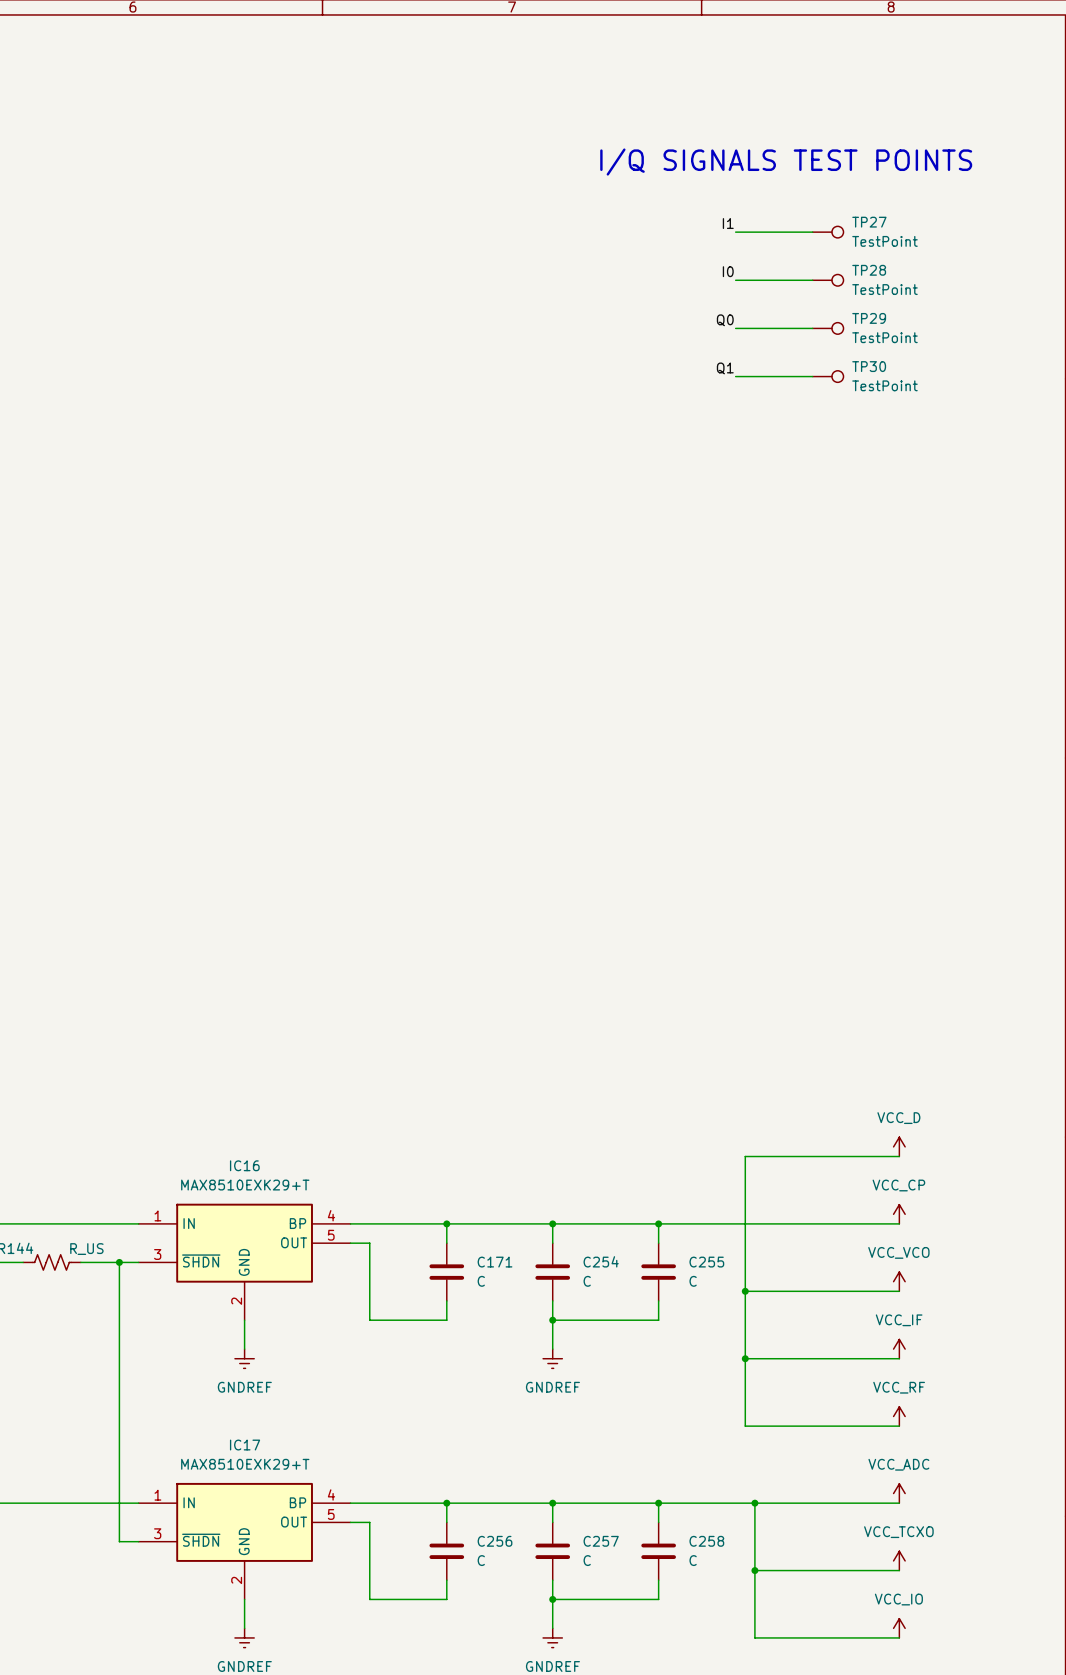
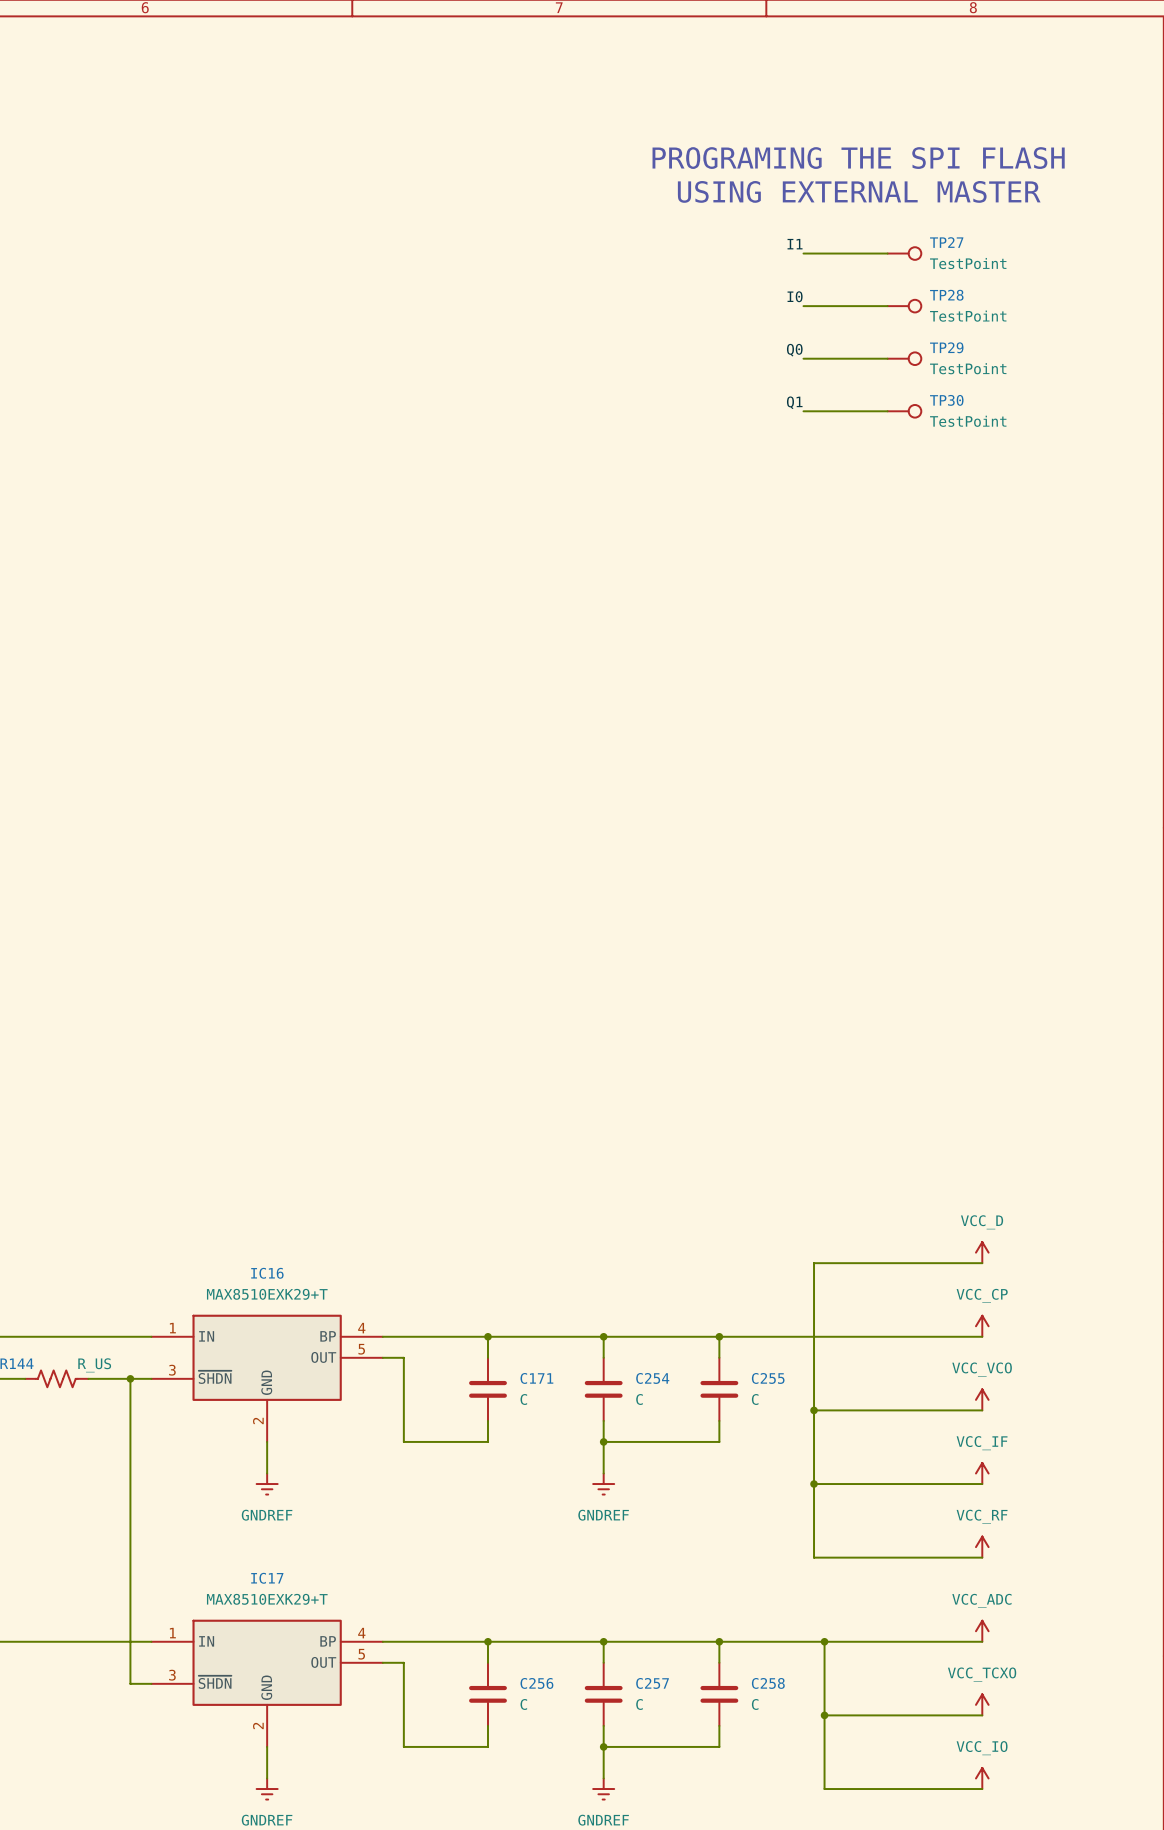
text: none -> PROGRAMING THE SPI FLASH (858, 158)
text: I/Q SIGNALS TEST POINTS (786, 162) -> none
text: none -> USING EXTERNAL MASTER (859, 191)

